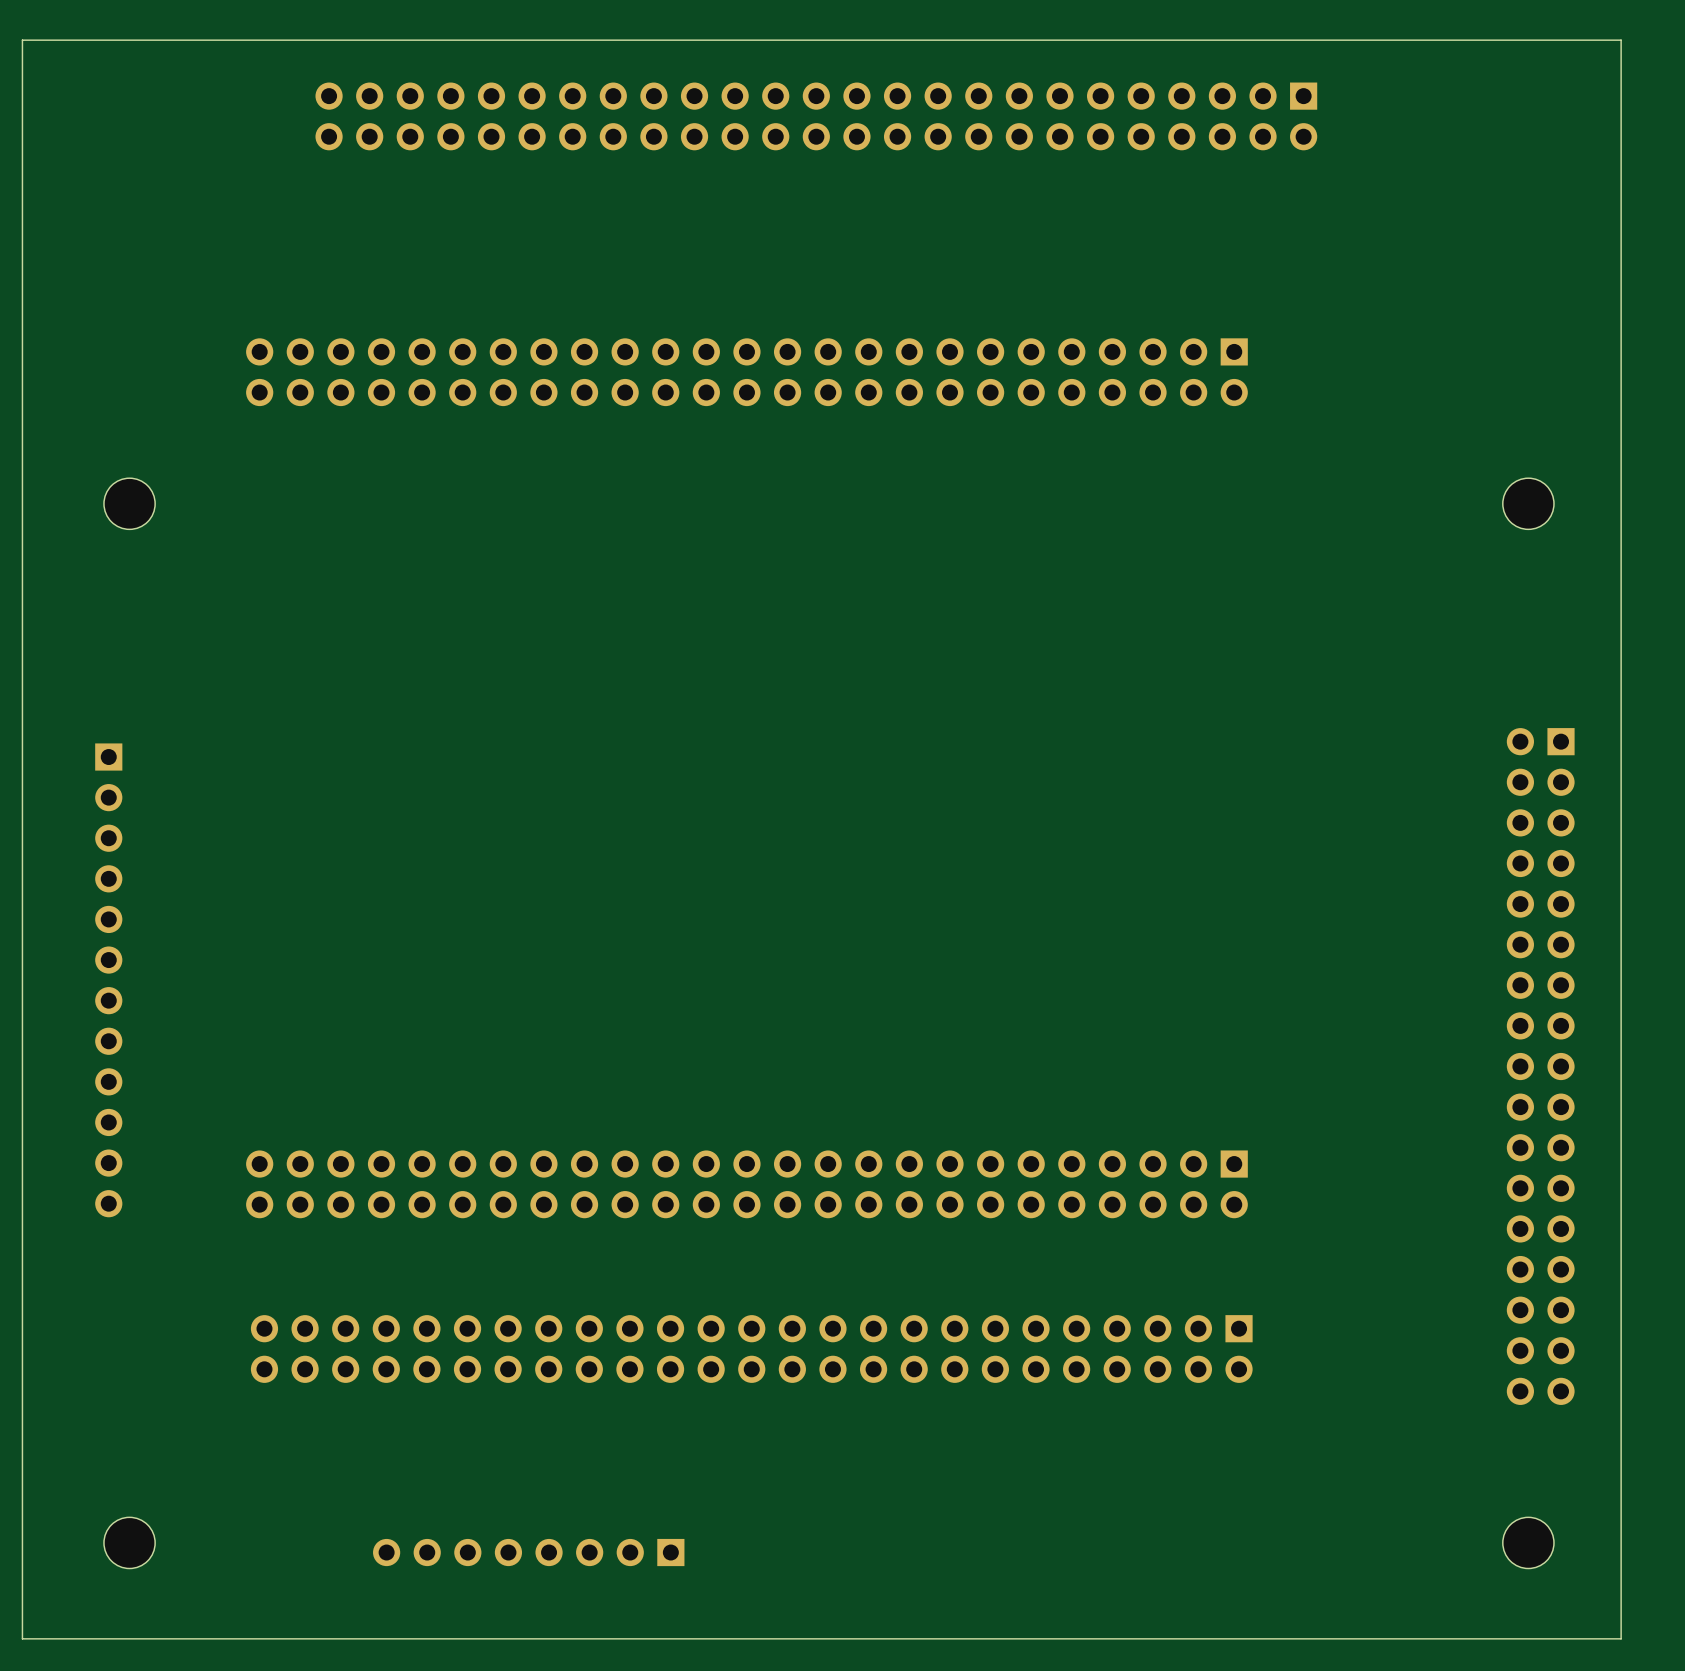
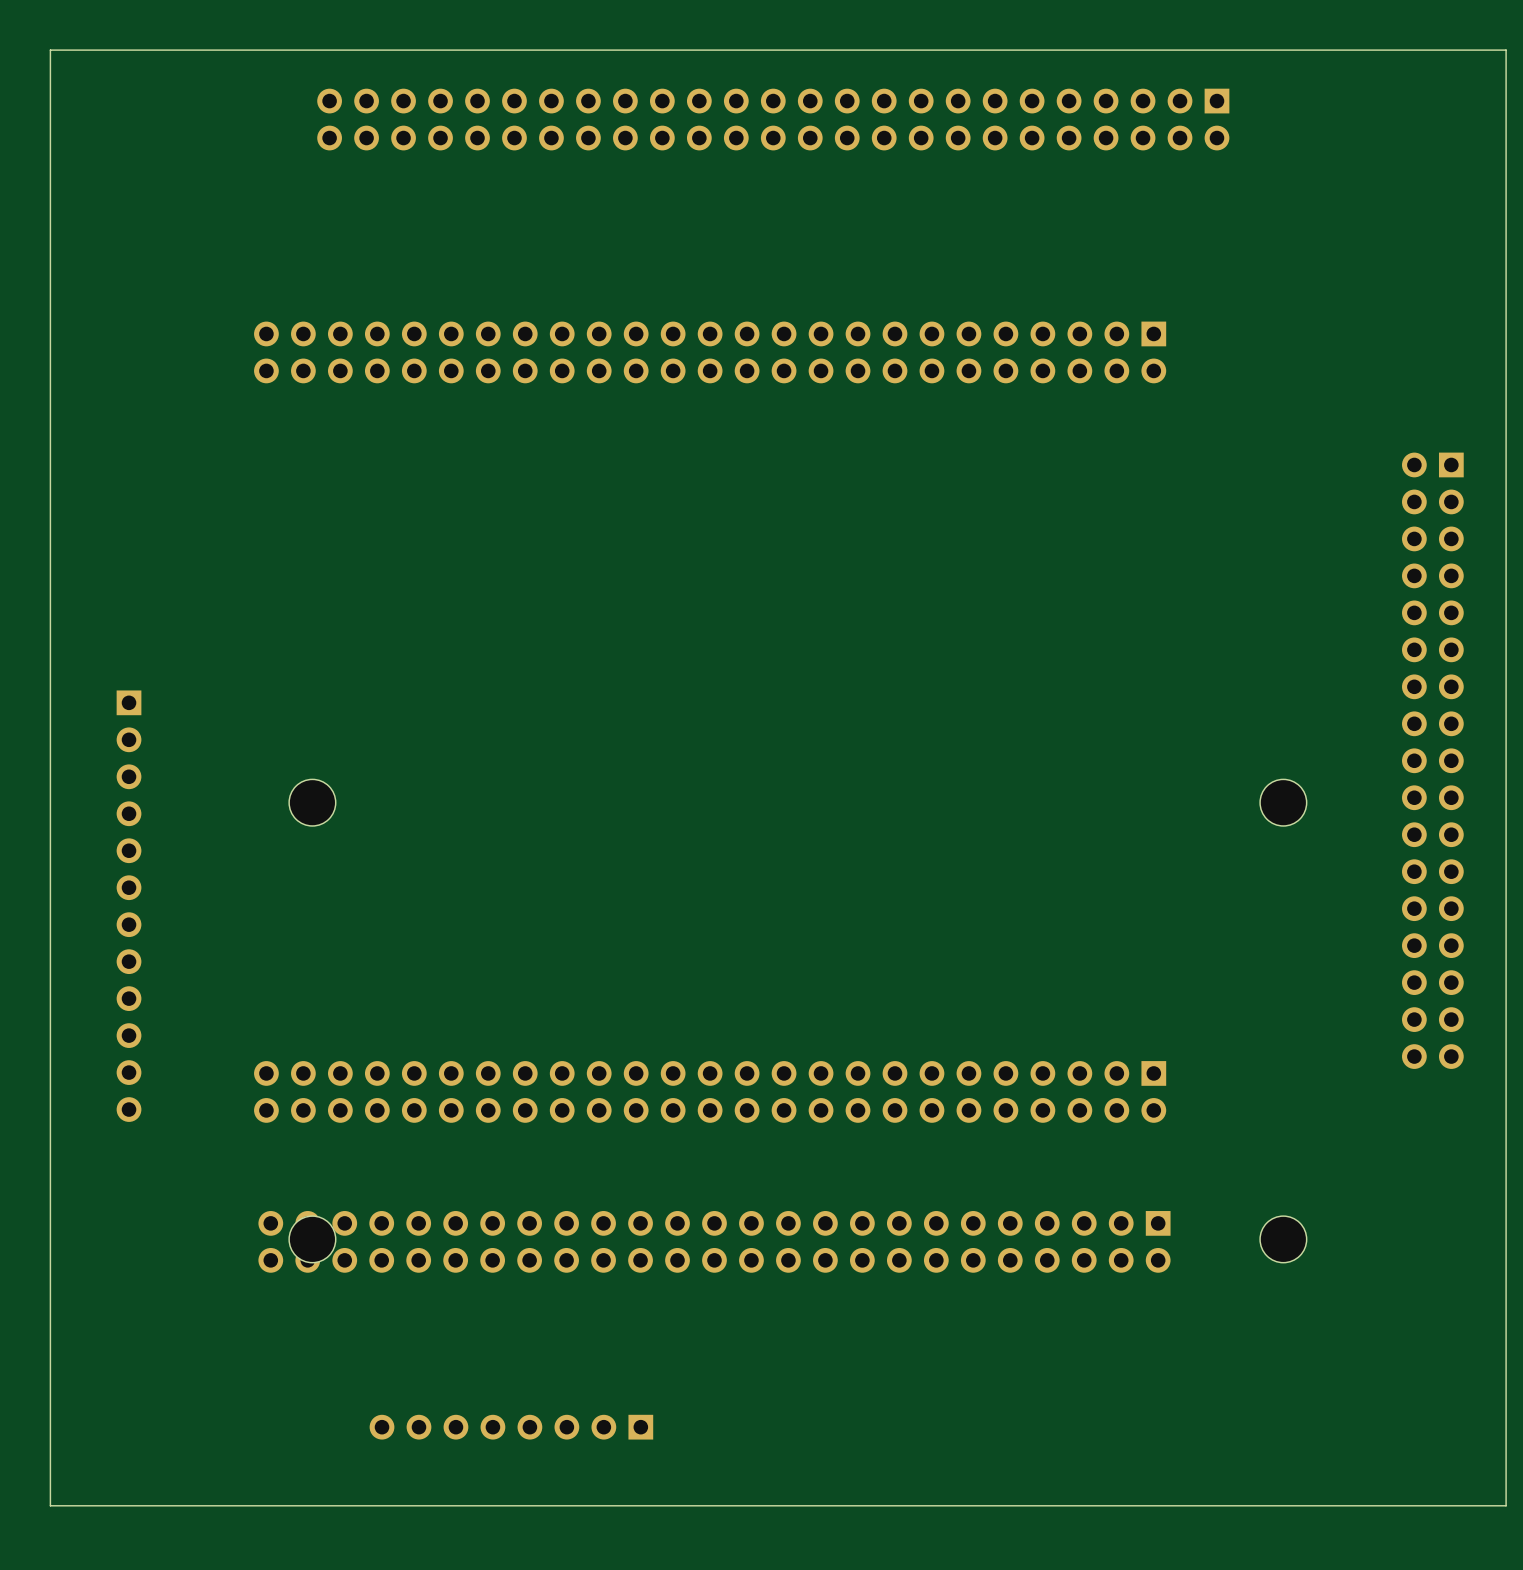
part: (129, 503) -> none
part: (1528, 503) -> none
part: none -> (312, 802)
part: none -> (1283, 802)
part position: (1540, 1066) -> (1432, 760)
part position: (129, 1542) -> (312, 1239)
part position: (1528, 1542) -> (1283, 1239)

